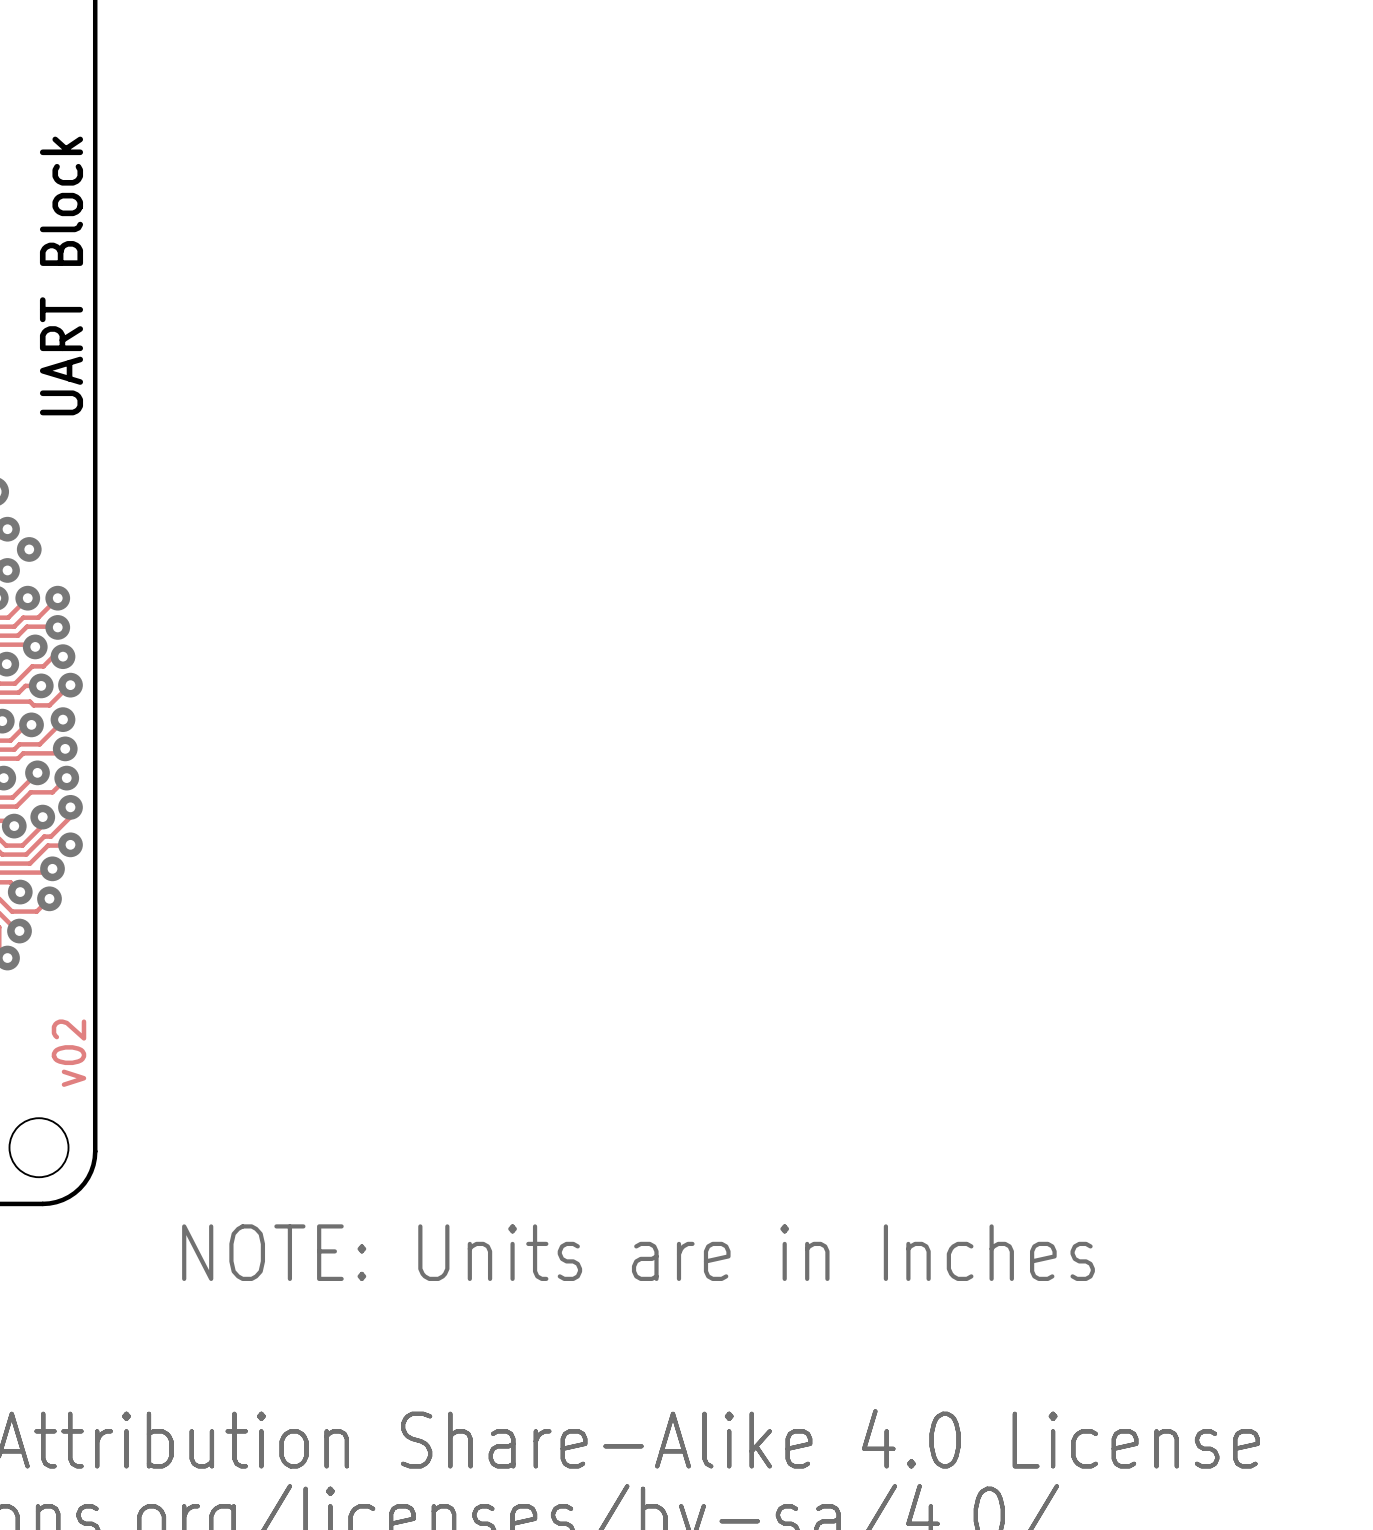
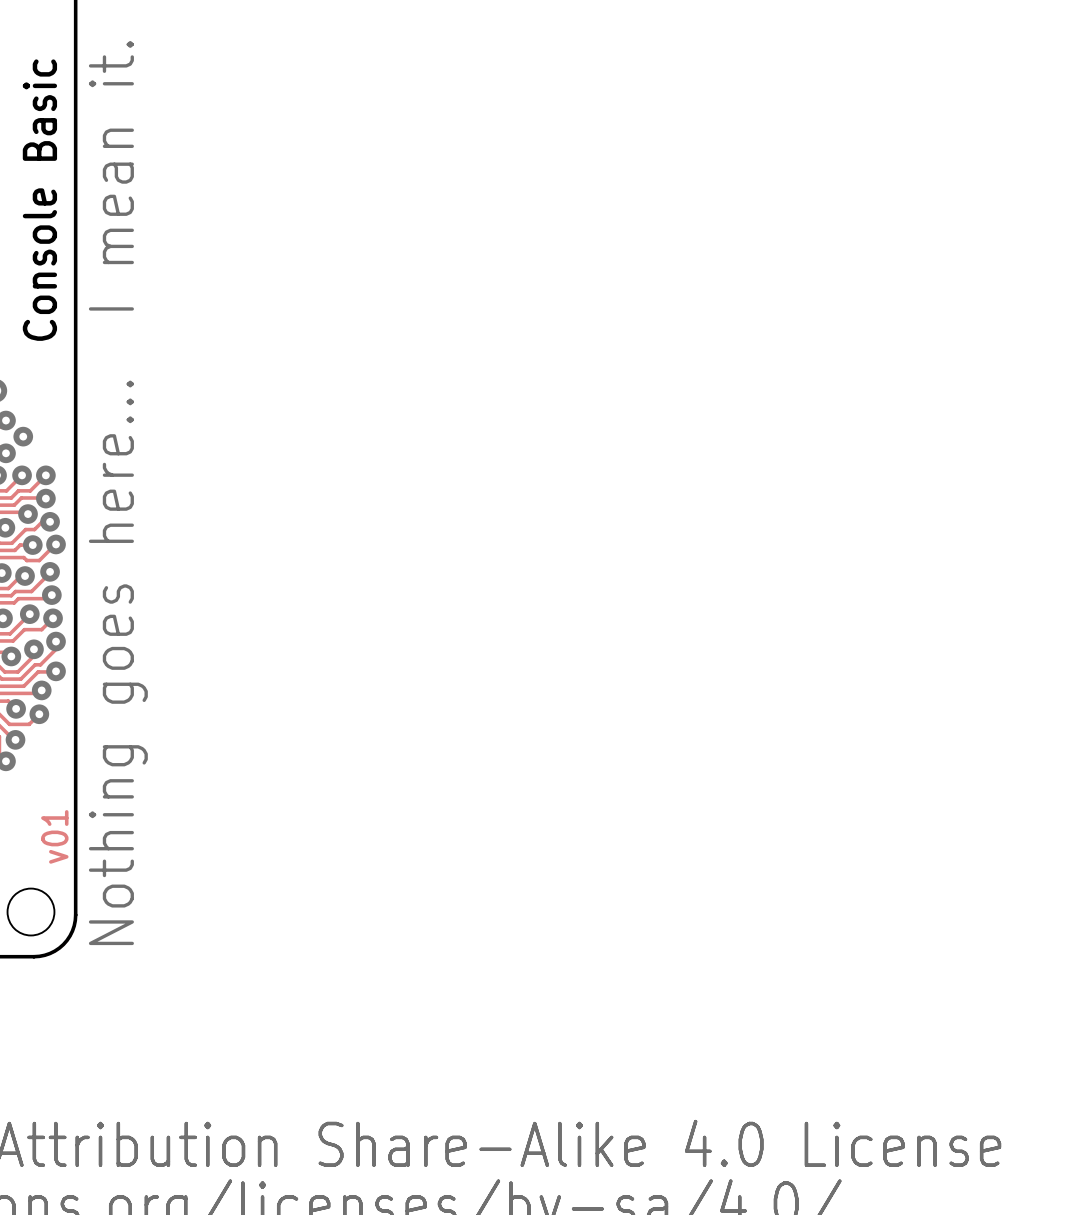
text: none -> Console Basic (39, 200)
text: UART Block (61, 275) -> none
text: none -> Nothing goes here... I mean it. (118, 493)
text: v02 (68, 1053) -> v01 (54, 836)
text: NOTE: Units are in Inches (638, 1252) -> none

